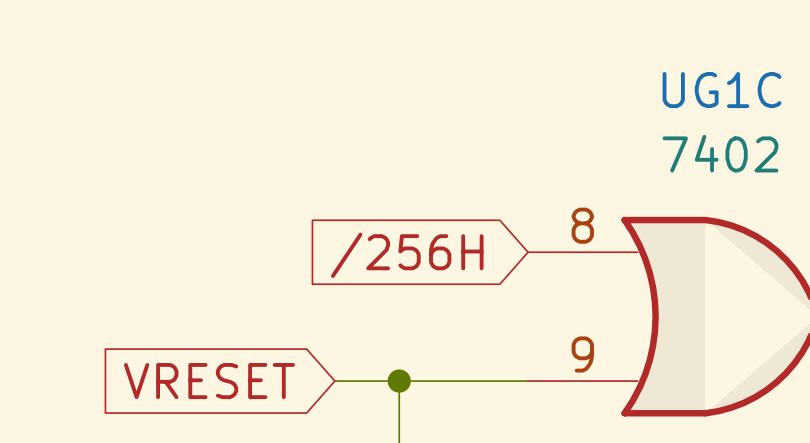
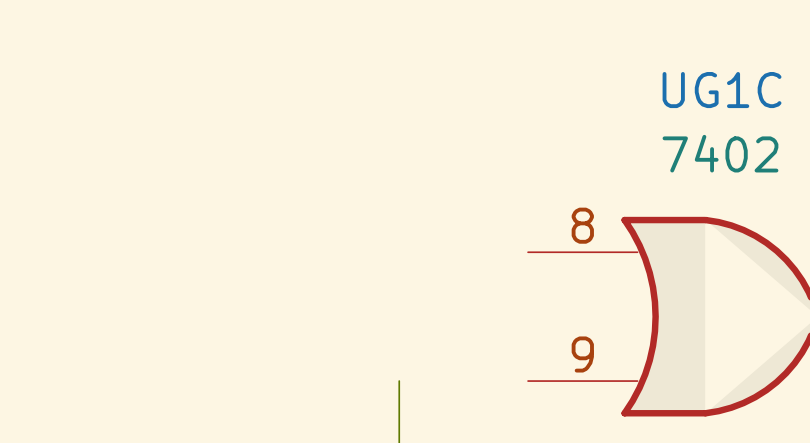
global label: /256H (407, 255) -> none
global label: VRESET (209, 381) -> none
wire: (334, 381) (528, 381) -> none
junction: (399, 381) -> none

